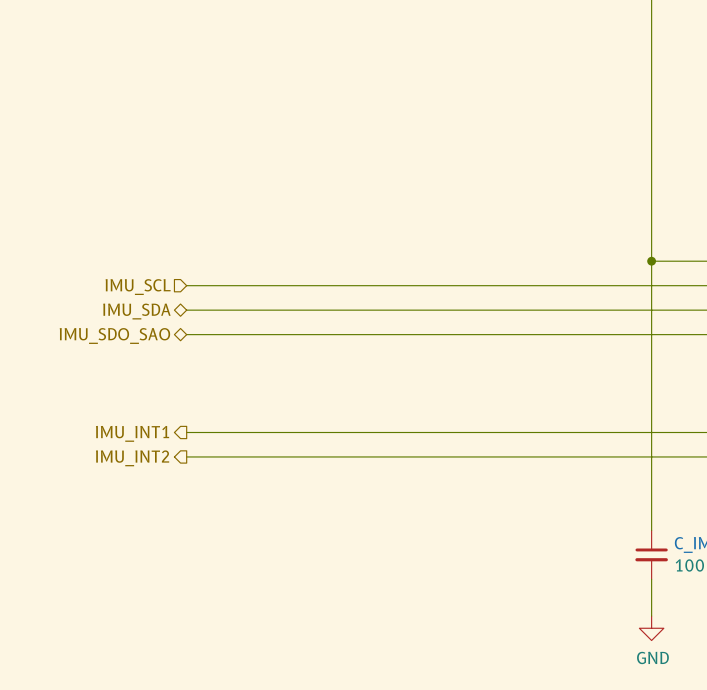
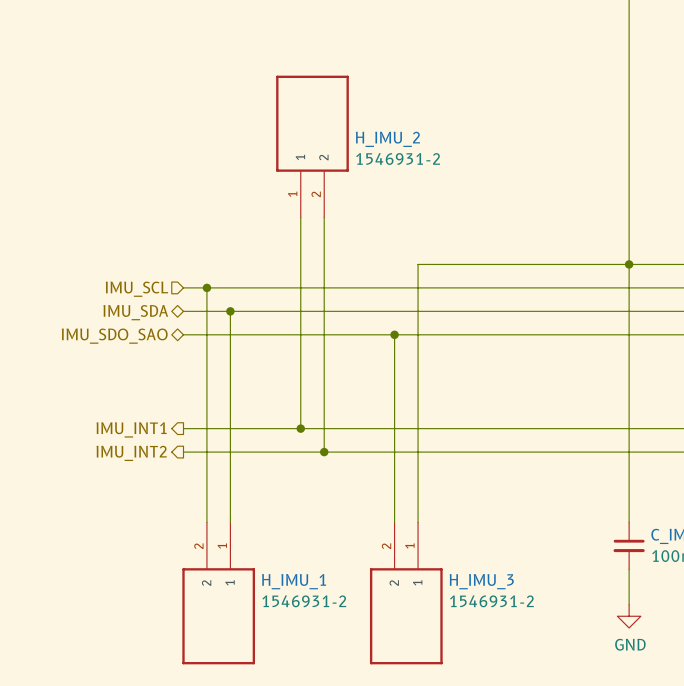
H_IMU_2: none -> 1546931-2 (312, 146)
wire: none -> (300, 217) (300, 428)
wire: none -> (324, 217) (324, 452)
wire: none -> (629, 264) (418, 264) (418, 522)
wire: none -> (206, 287) (206, 522)
junction: none -> (206, 287)
wire: none -> (230, 311) (230, 522)
junction: none -> (230, 311)
wire: none -> (394, 334) (394, 522)
junction: none -> (394, 334)
junction: none -> (300, 428)
junction: none -> (324, 452)
H_IMU_1: none -> 1546931-2 (218, 593)
H_IMU_3: none -> 1546931-2 (406, 593)

